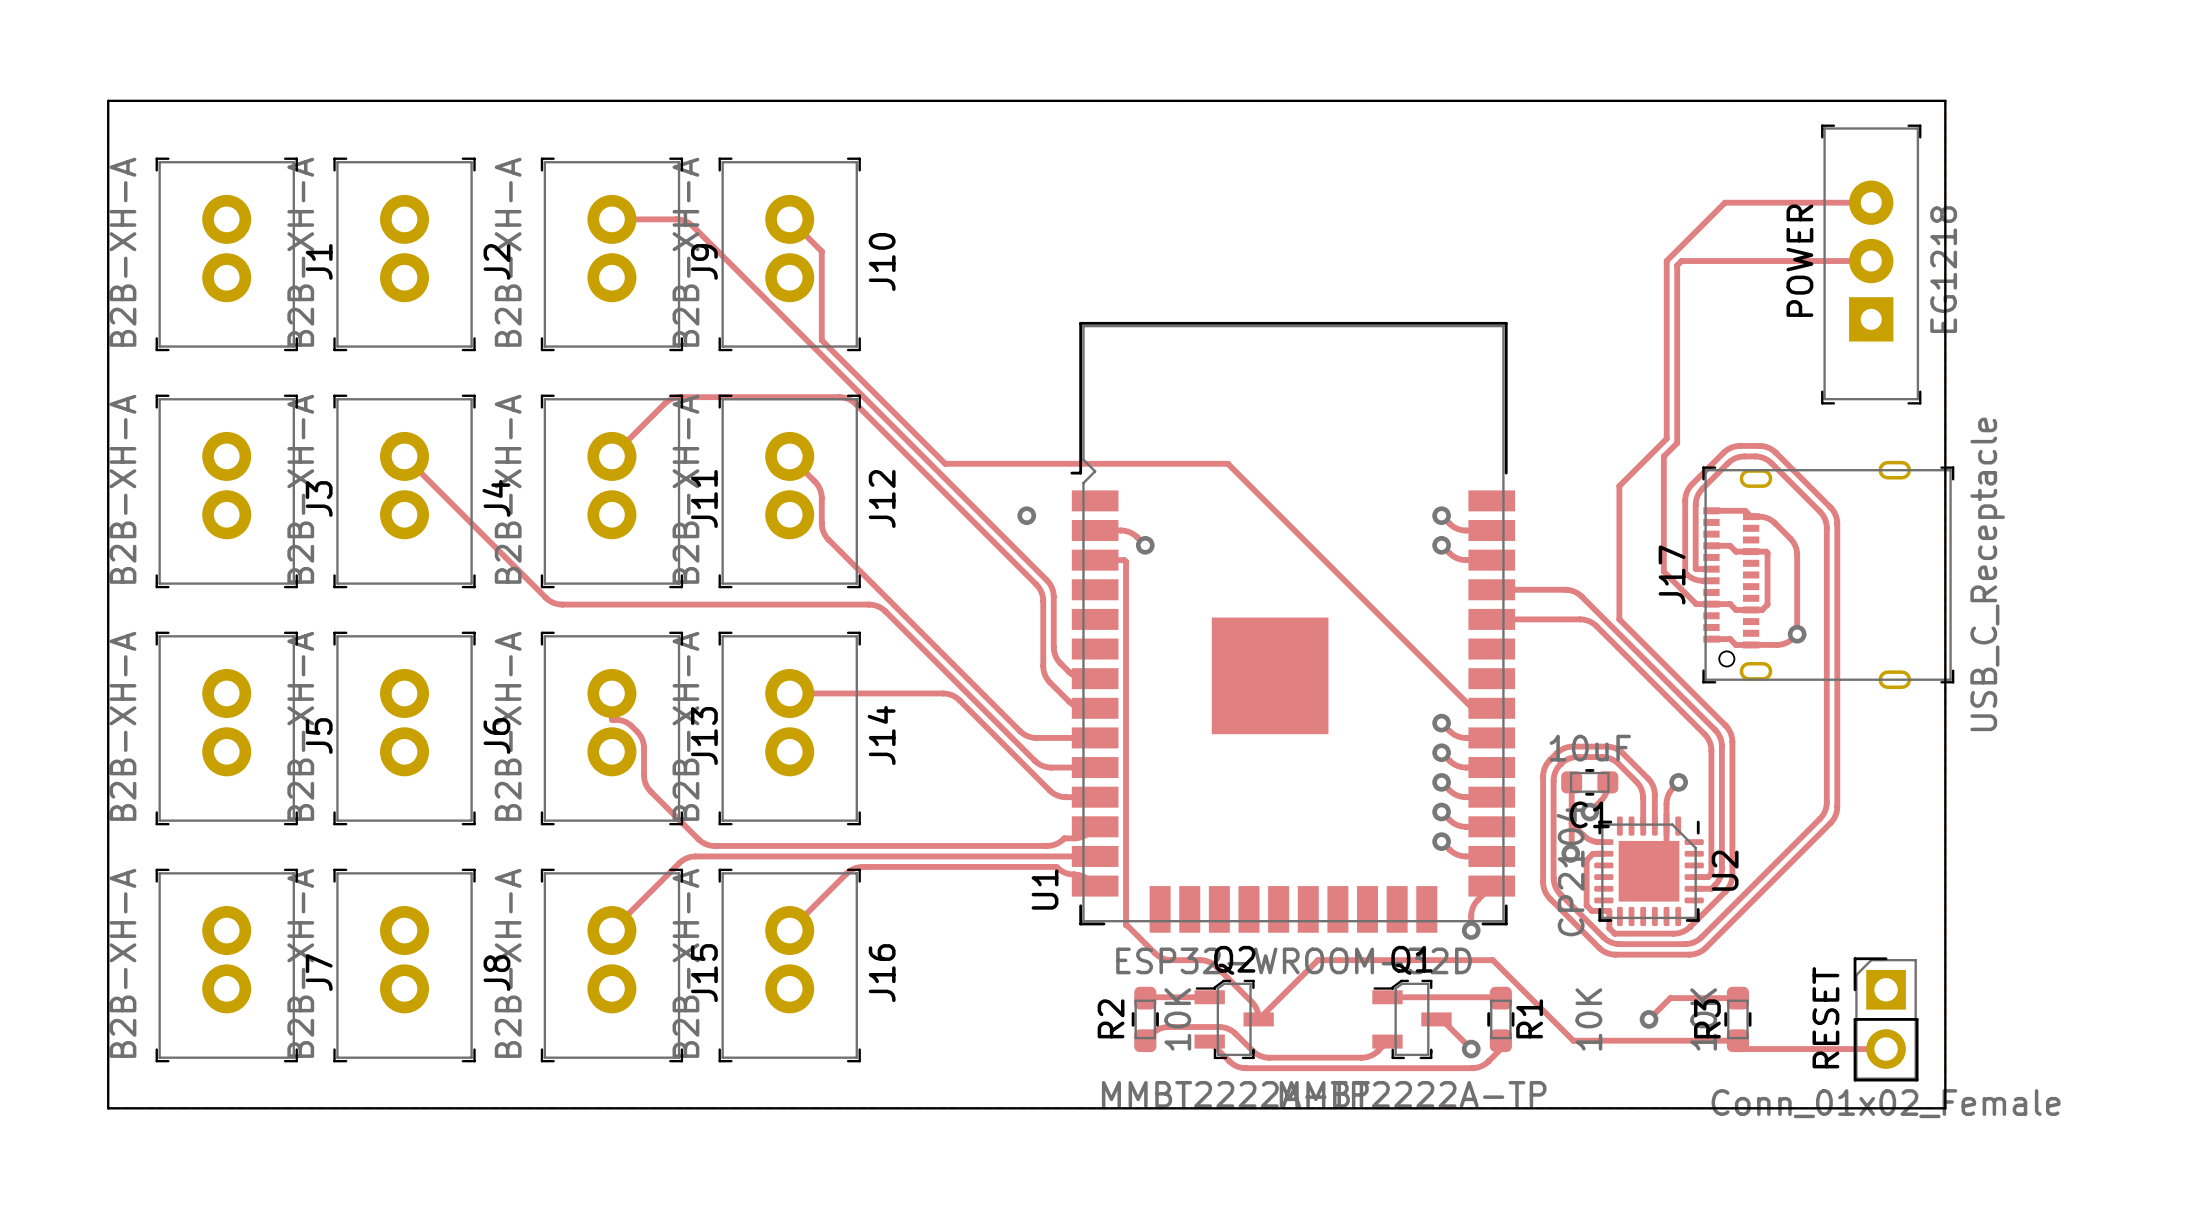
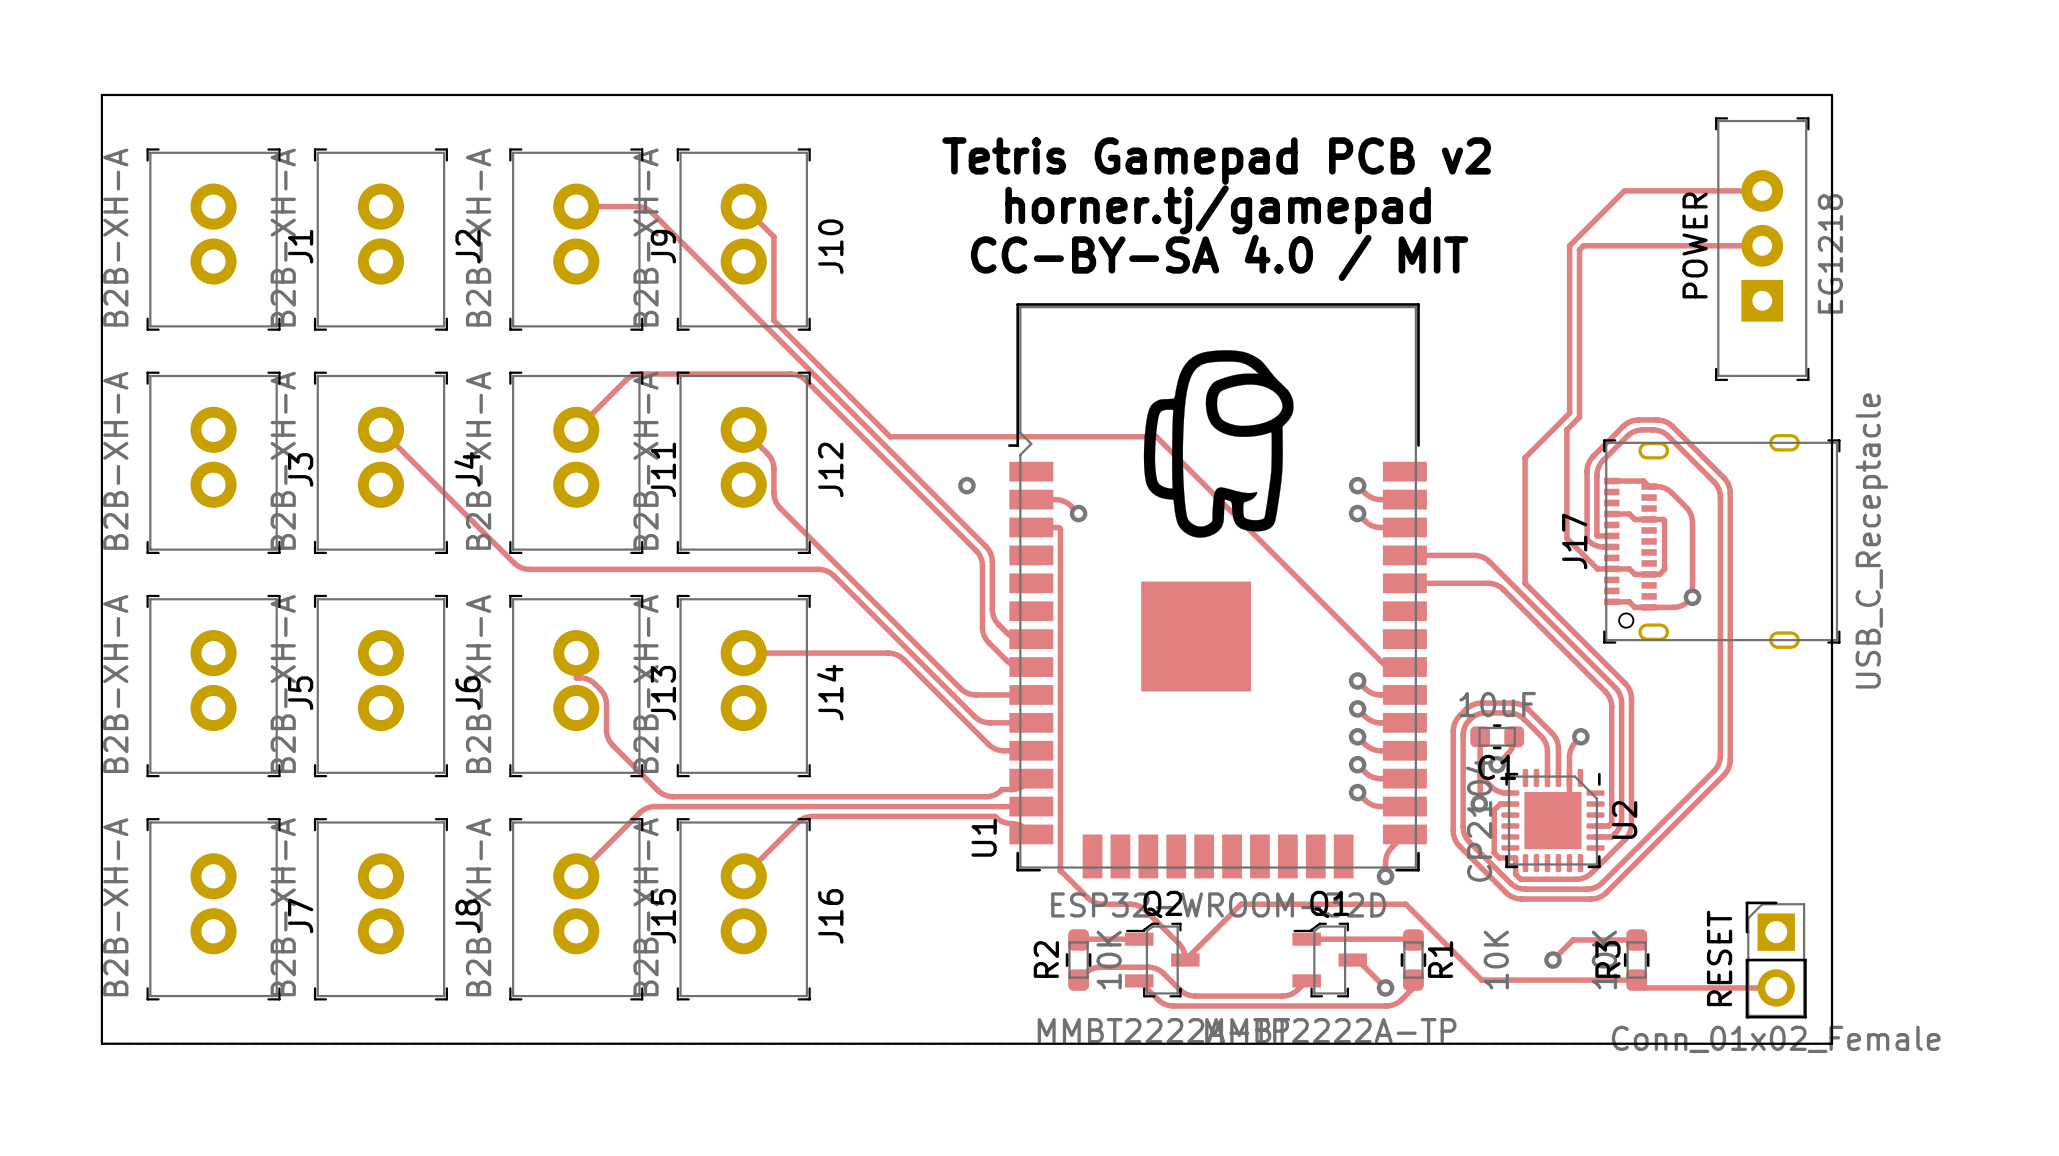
text: none -> Tetris Gamepad PCB v2 (1216, 161)
text: none -> horner.tj/gamepad (1218, 209)
text: none -> CC-BY-SA 4.0 / MIT (1219, 257)
drawing: none -> [1143, 350, 1294, 538]

